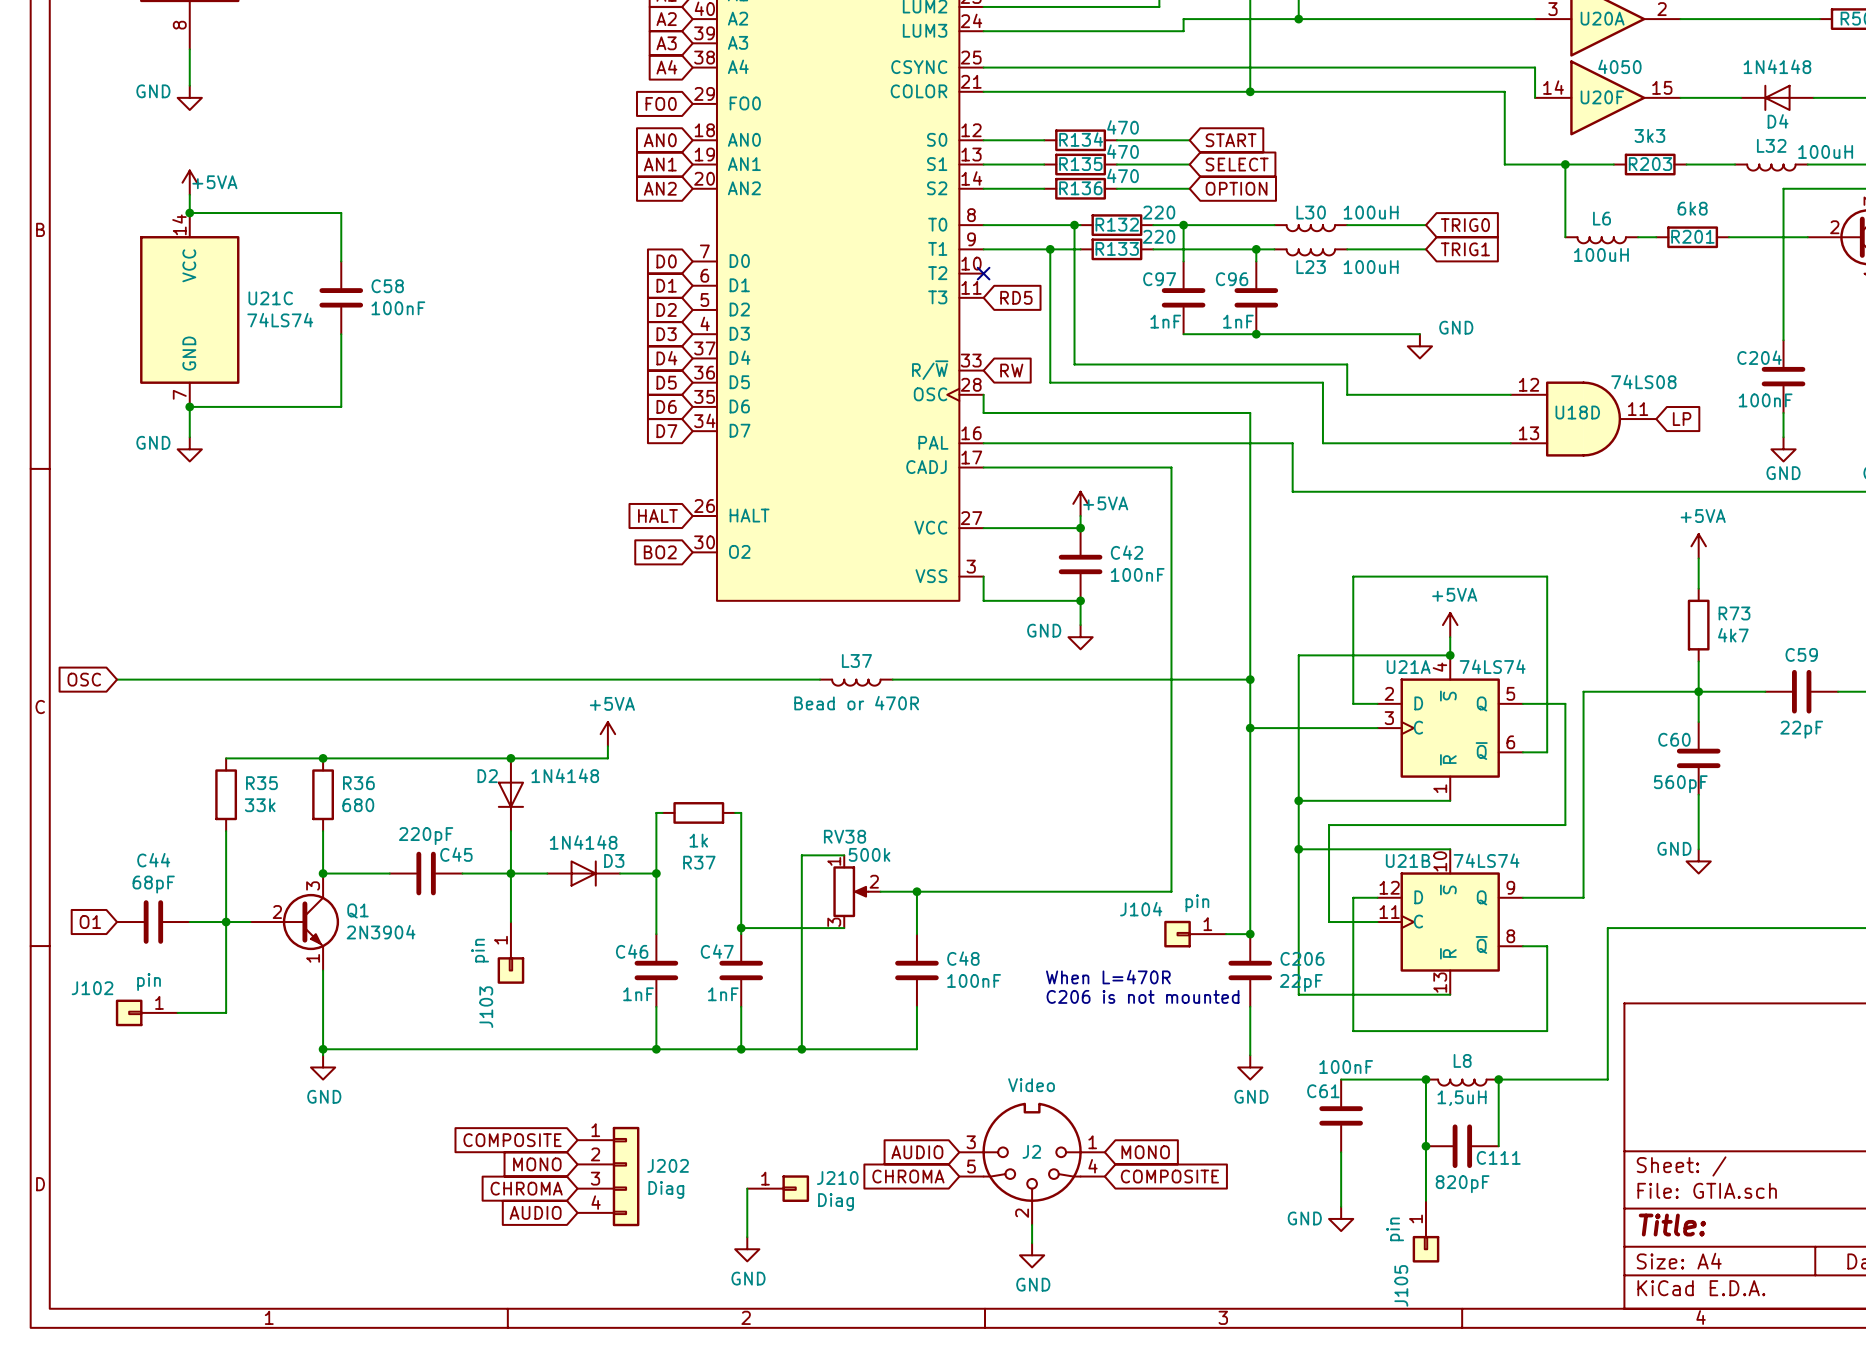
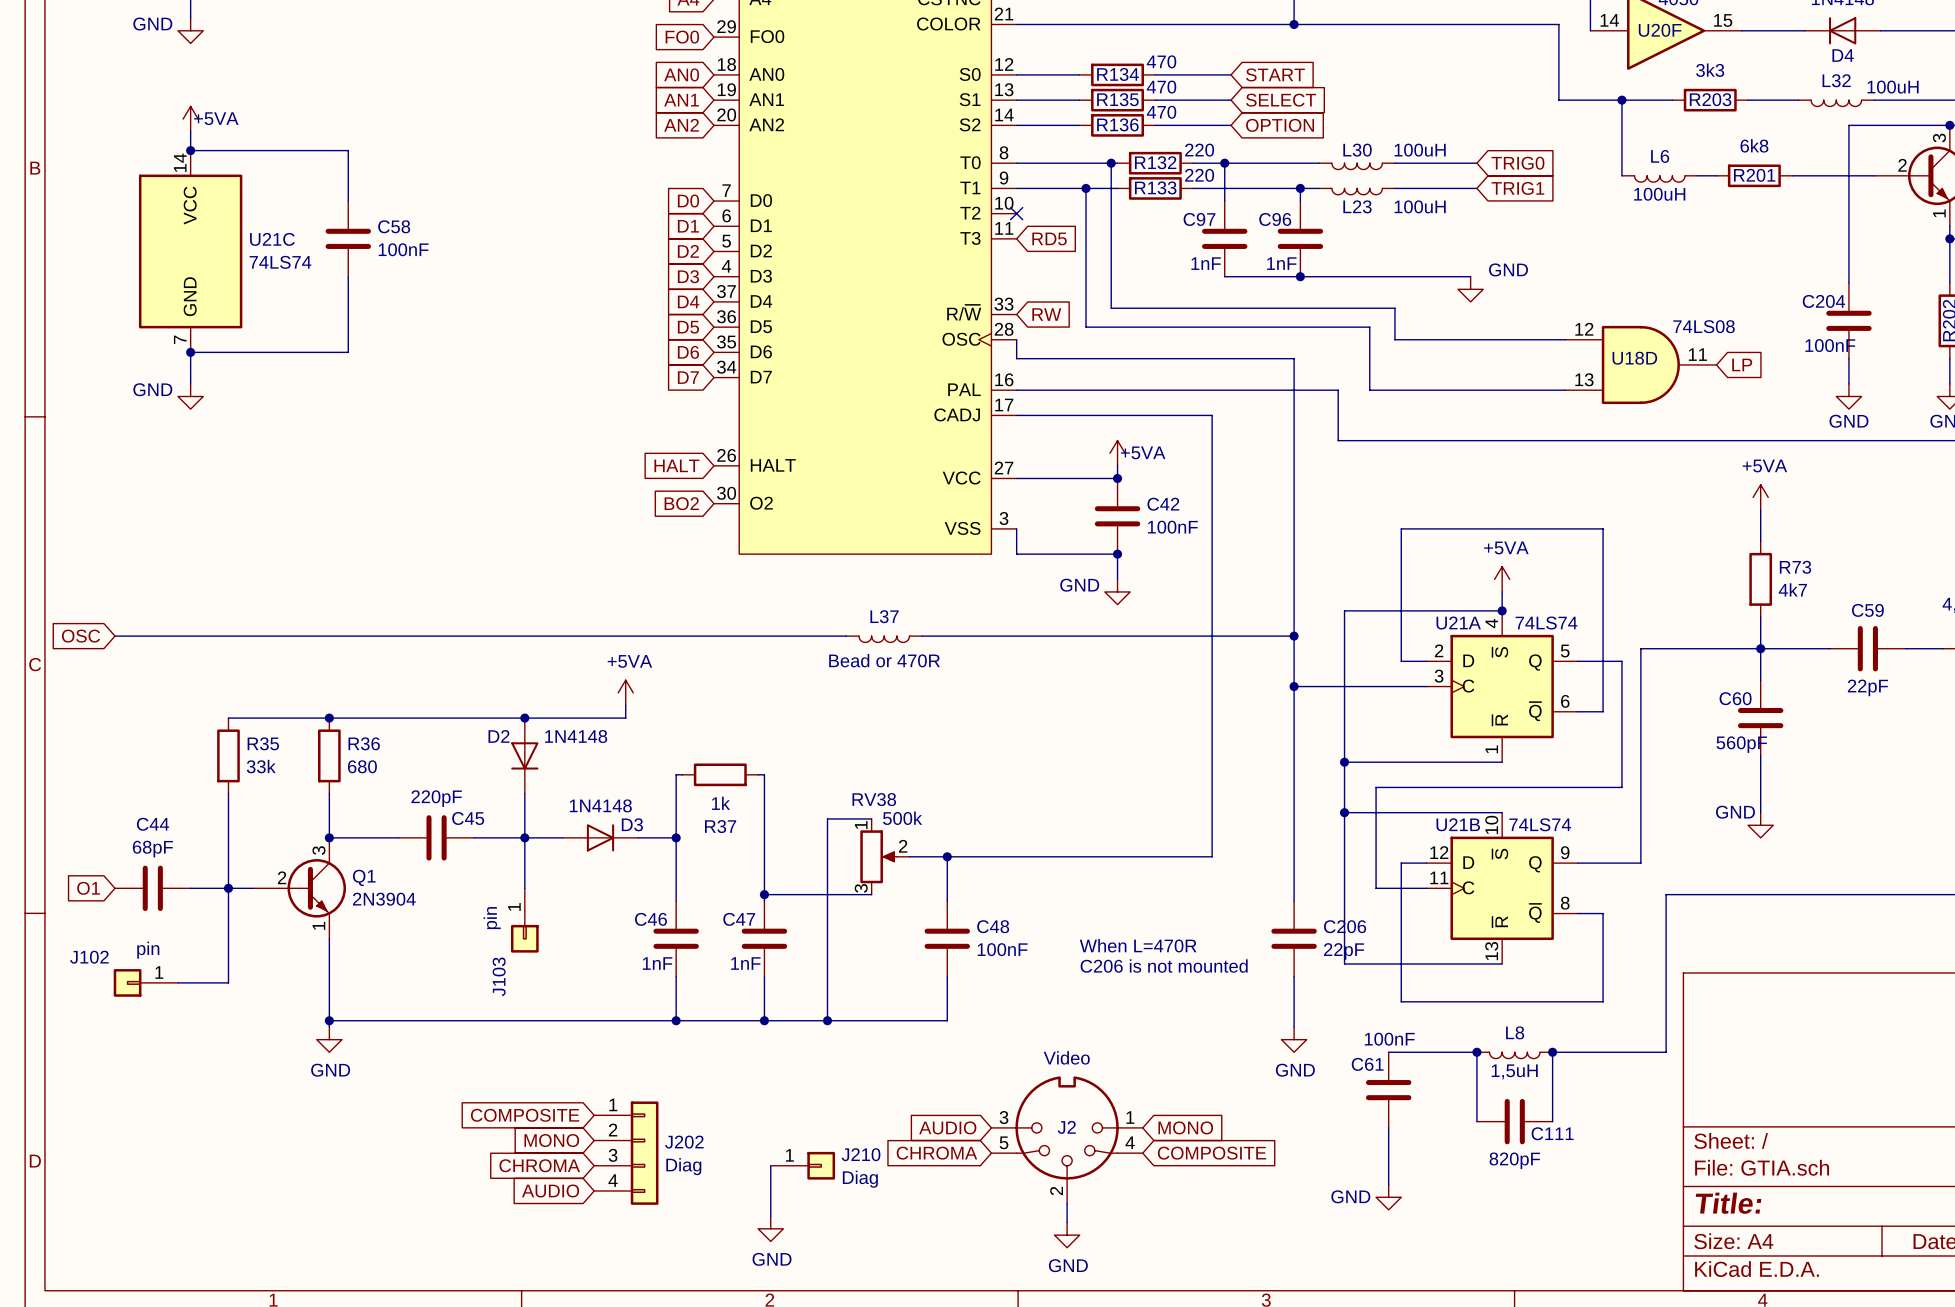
J104: pin (1195, 934) -> none
wire: (1226, 934) (1250, 934) -> none
junction: (1250, 934) -> none
wire: (1425, 1146) (1425, 1200) -> none
junction: (1425, 1146) -> none
J105: pin (1425, 1231) -> none

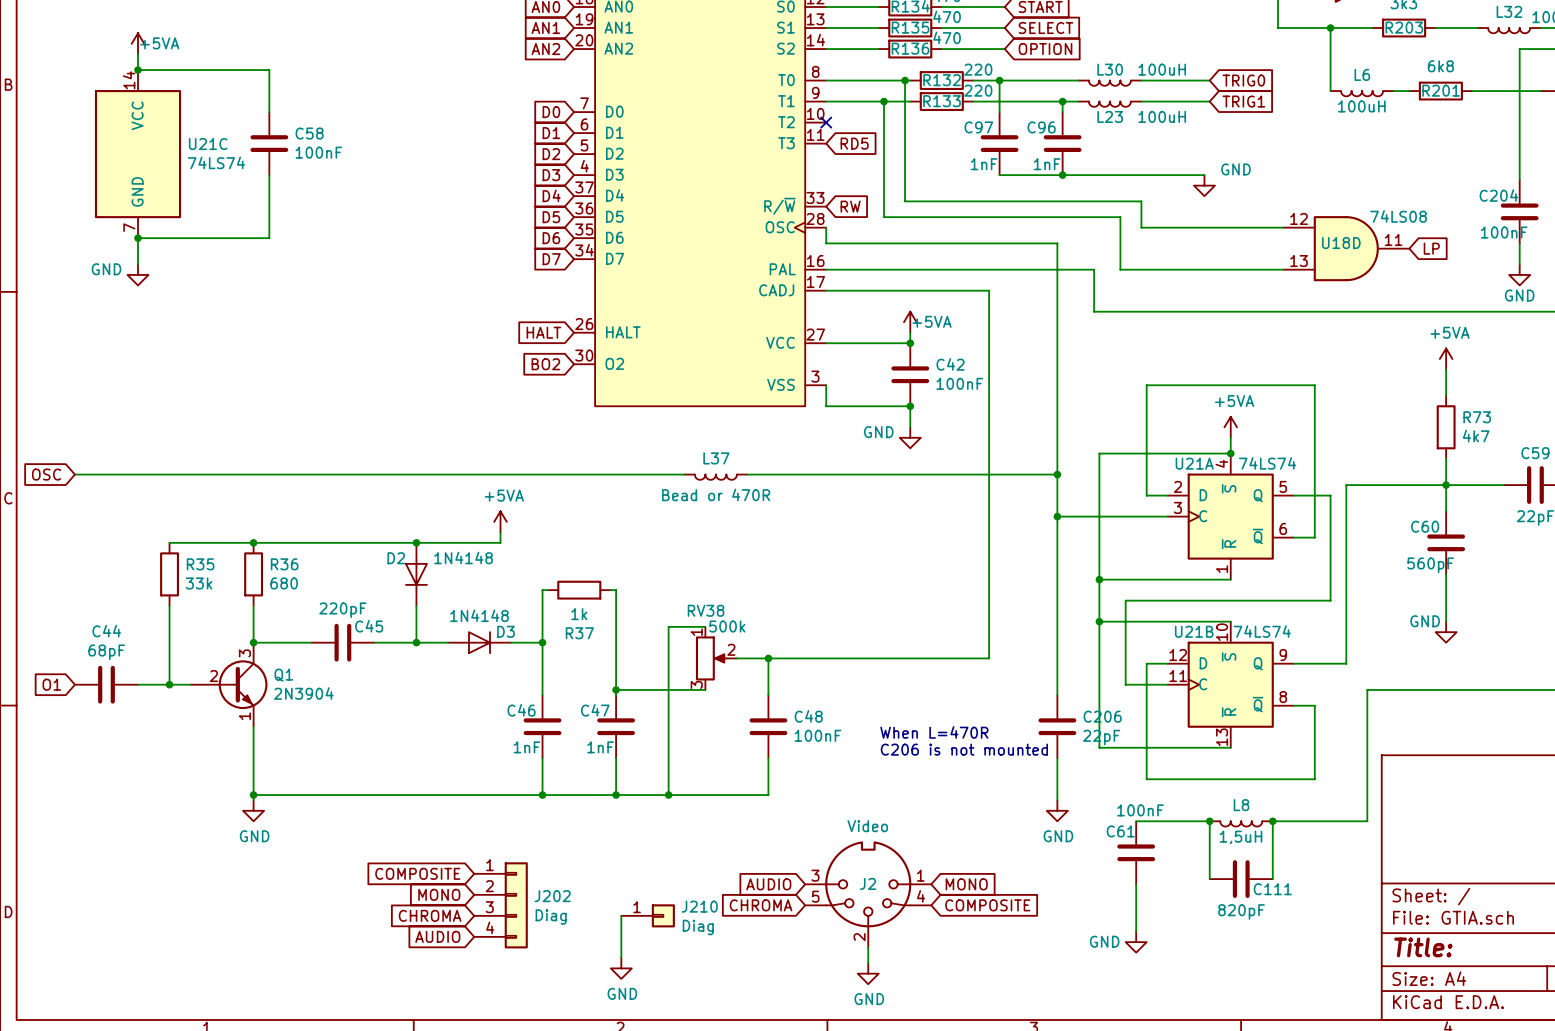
wire: (524, 837) (524, 888) -> none
wire: (228, 888) (228, 982) (178, 982) -> none
J103: pin (524, 920) -> none
J102: pin (145, 982) -> none

